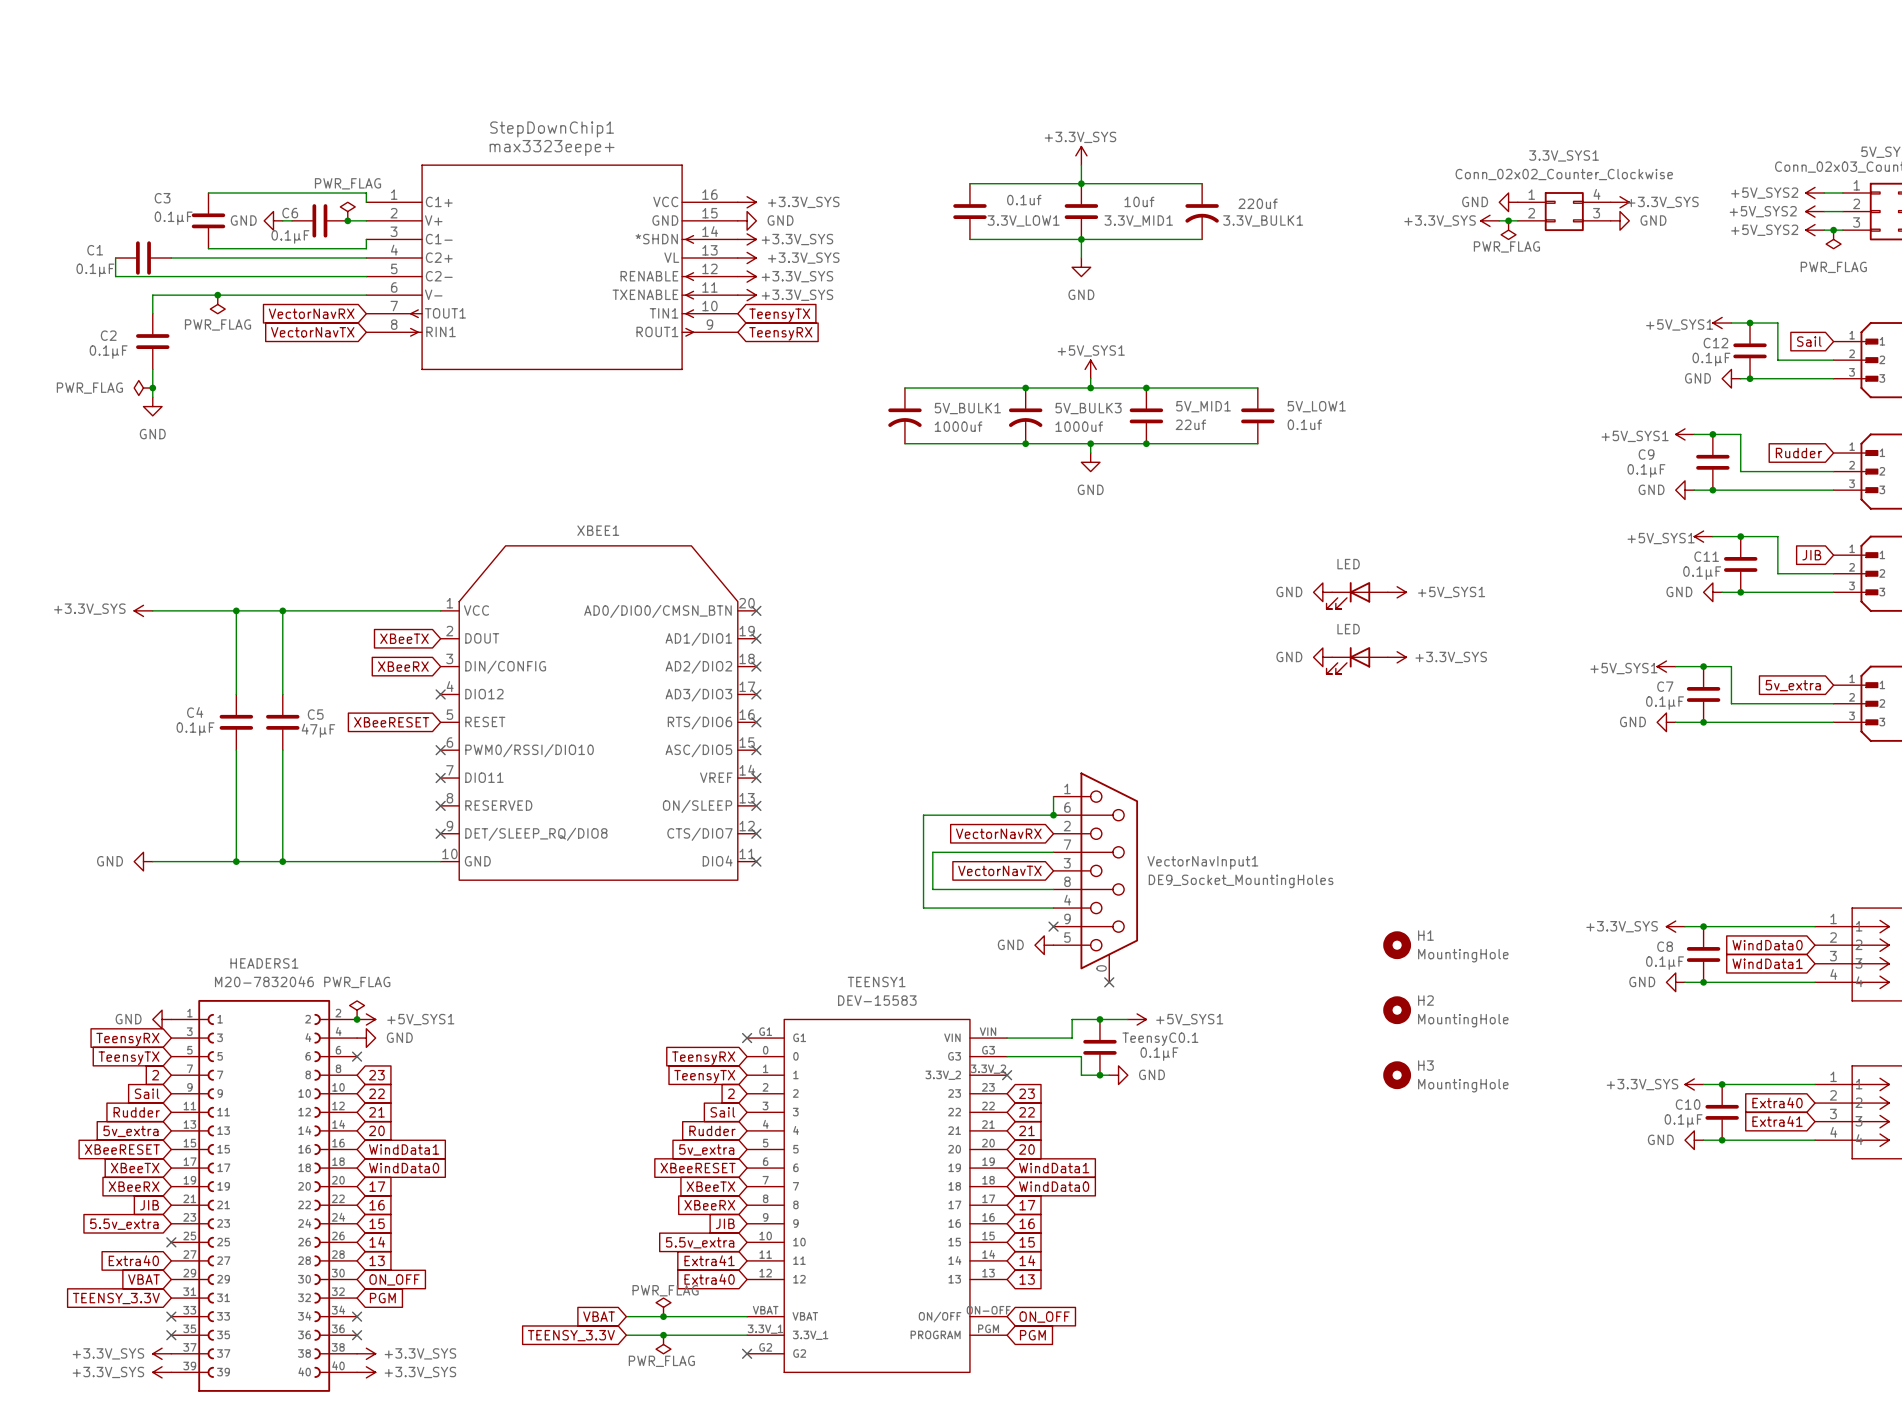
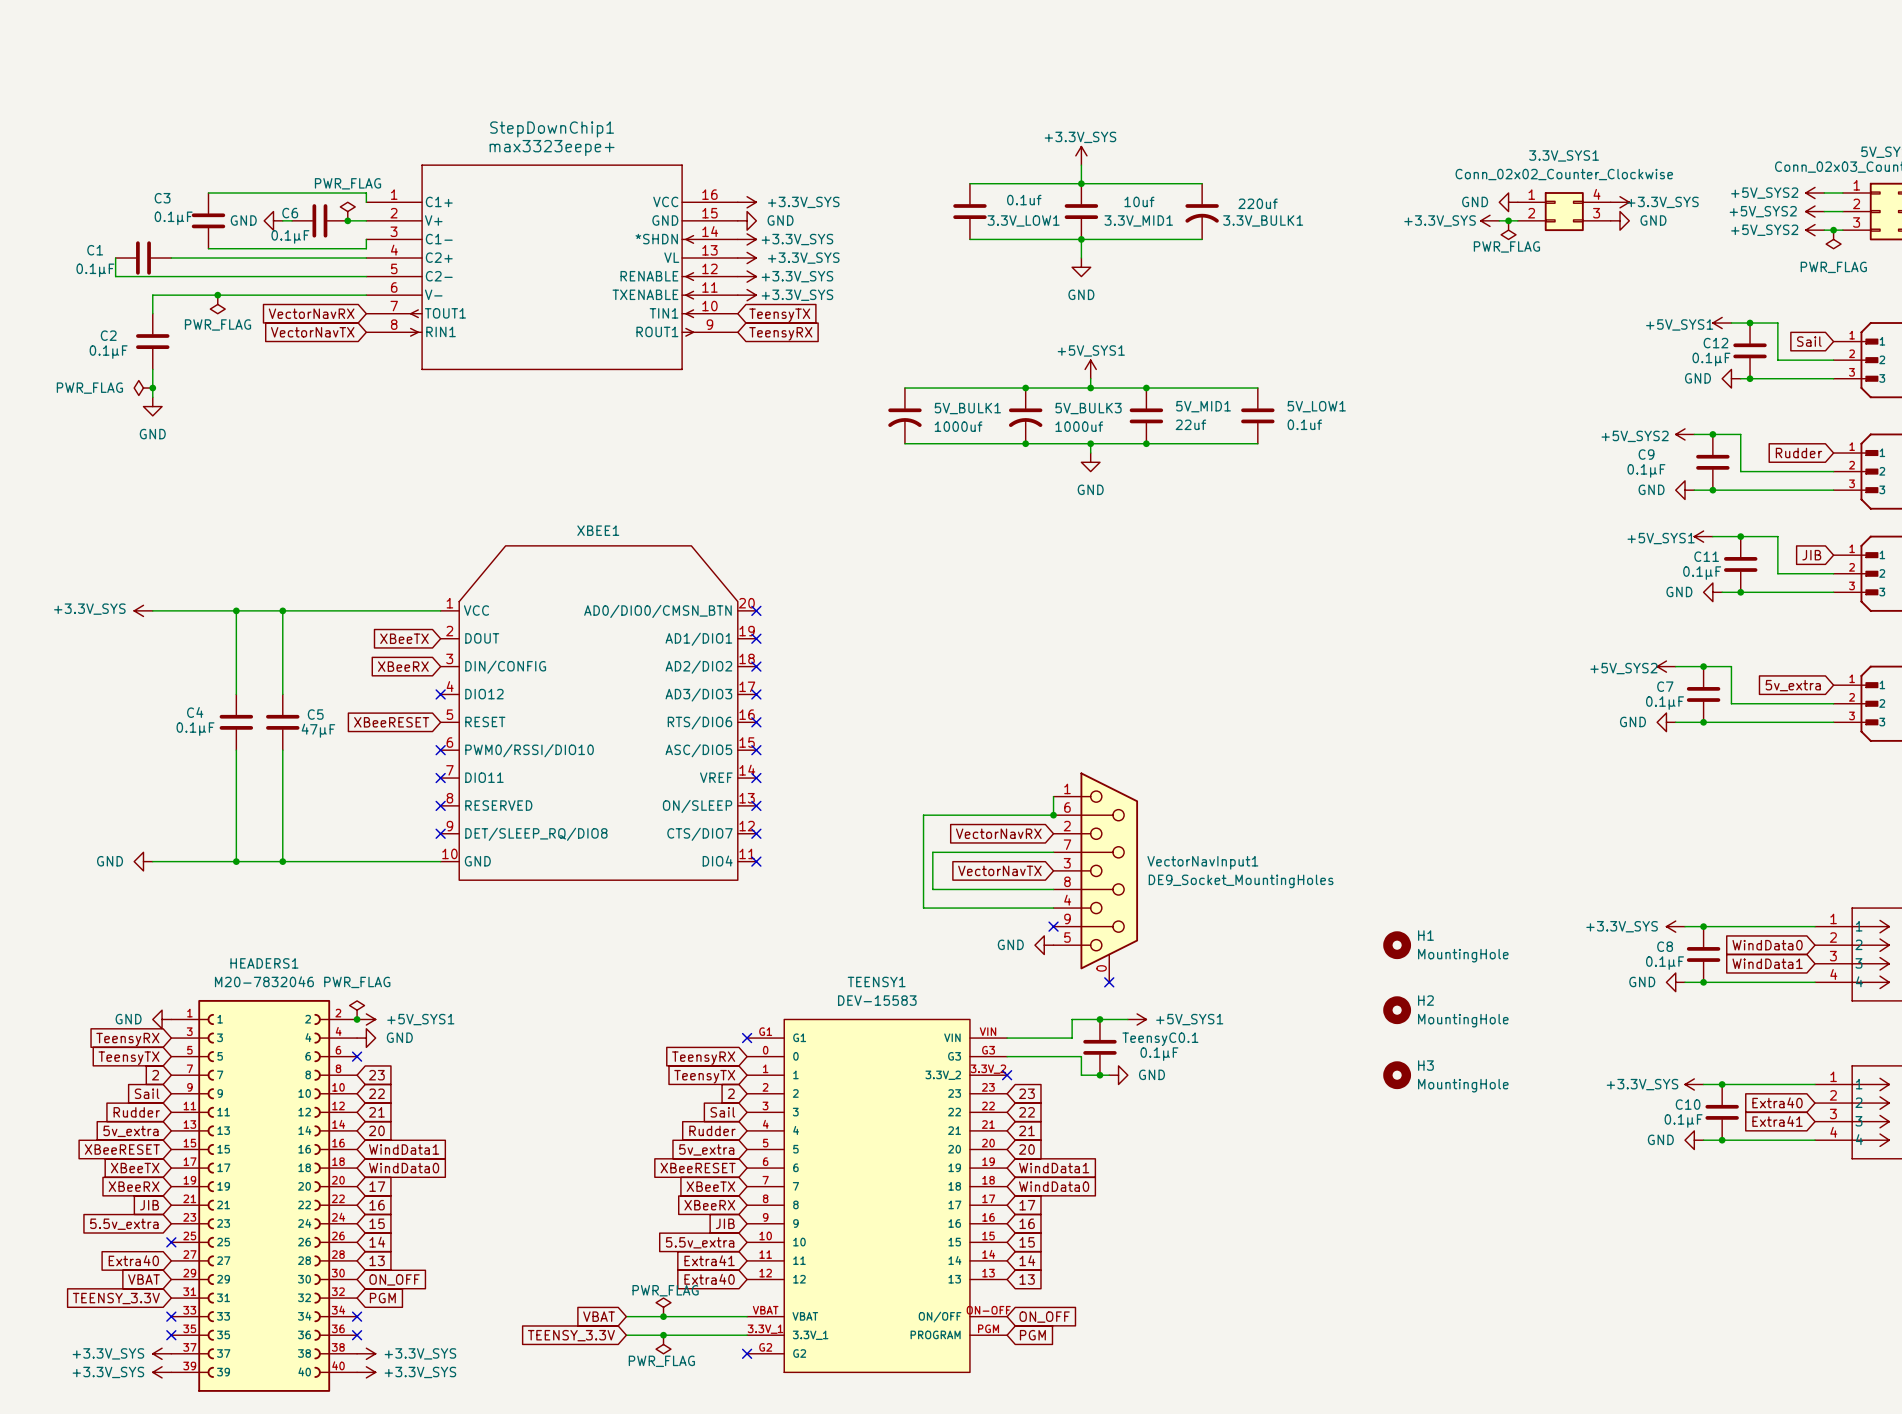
power symbol: +5V_SYS1 (1685, 434) -> +5V_SYS2 (1685, 434)
power symbol: GND (1322, 592) -> none
power symbol: +5V_SYS1 (1397, 592) -> none
part: LED (1357, 595) -> none
power symbol: GND (1322, 657) -> none
power symbol: +3.3V_SYS (1397, 657) -> none
part: LED (1357, 660) -> none
power symbol: +5V_SYS1 (1666, 666) -> +5V_SYS2 (1666, 666)

